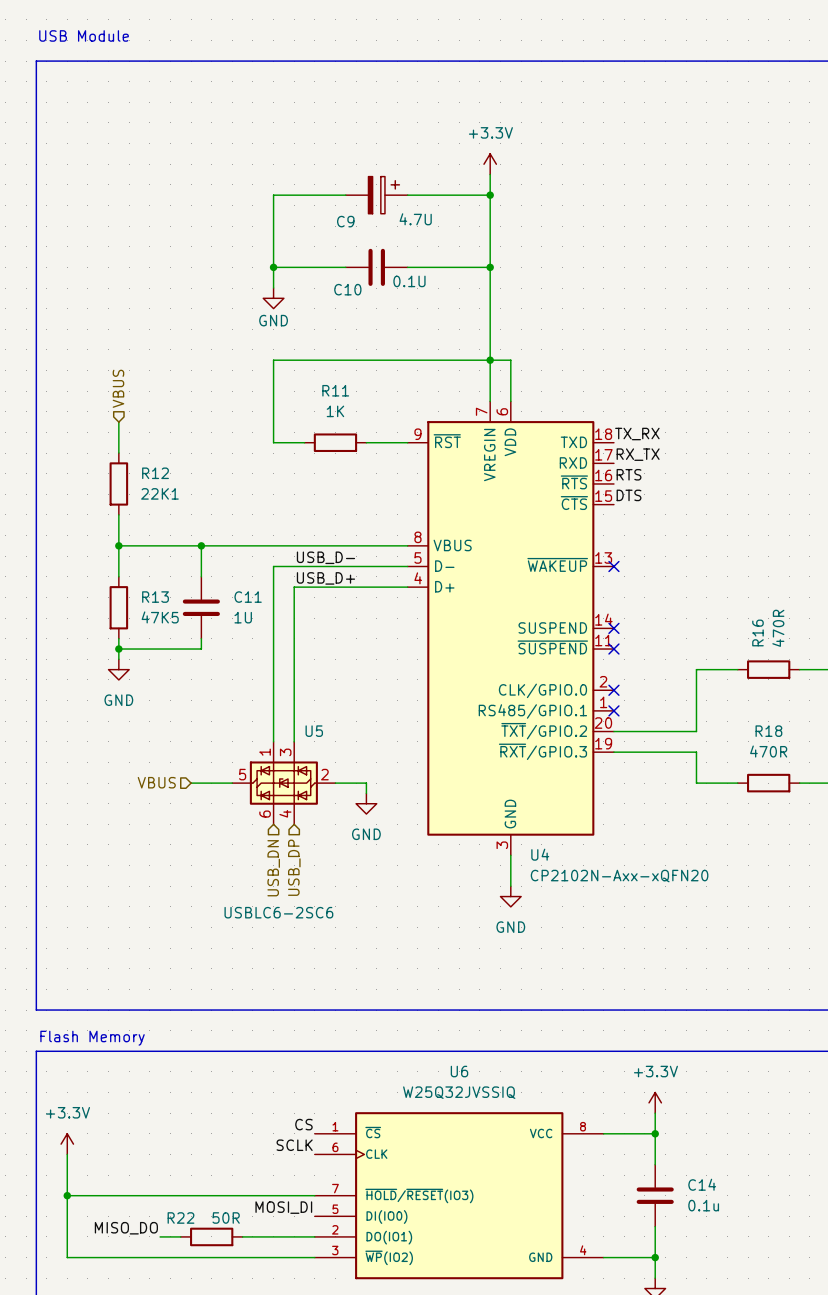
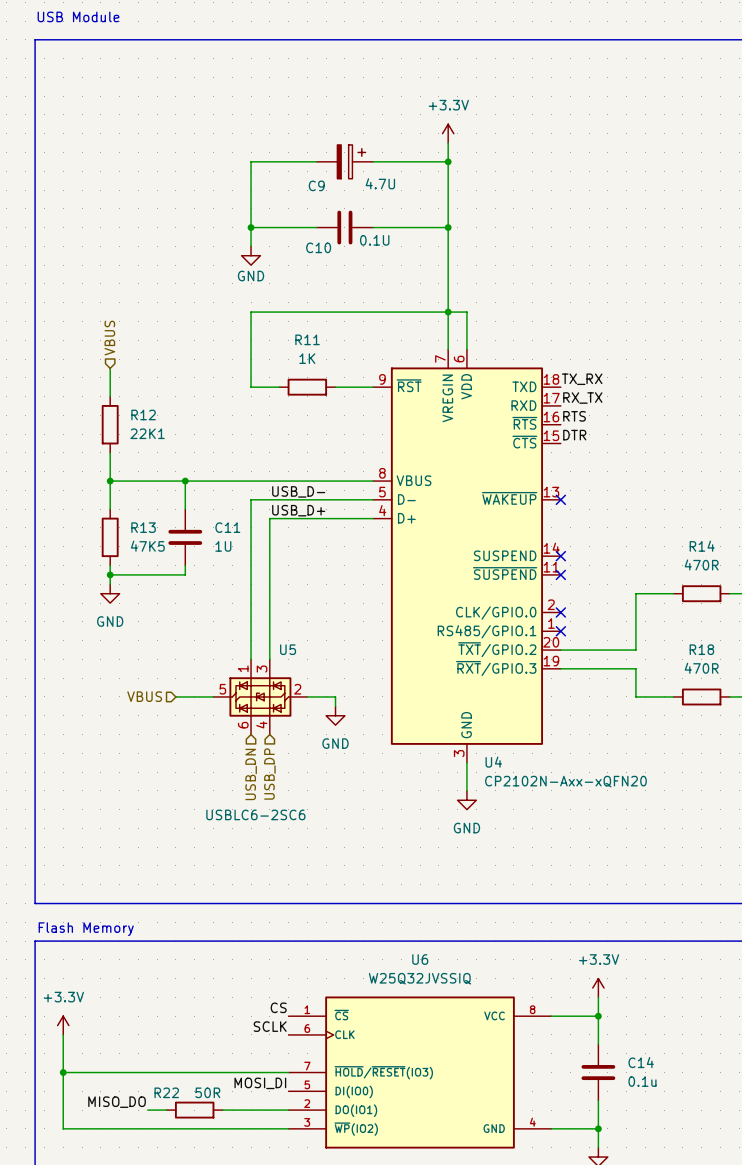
label: DTS (629, 495) -> DTR (574, 435)
R16 value rotation: 0° (778, 628) -> 90° clockwise (701, 564)
R16 name: R16 (757, 632) -> R14 (702, 546)

